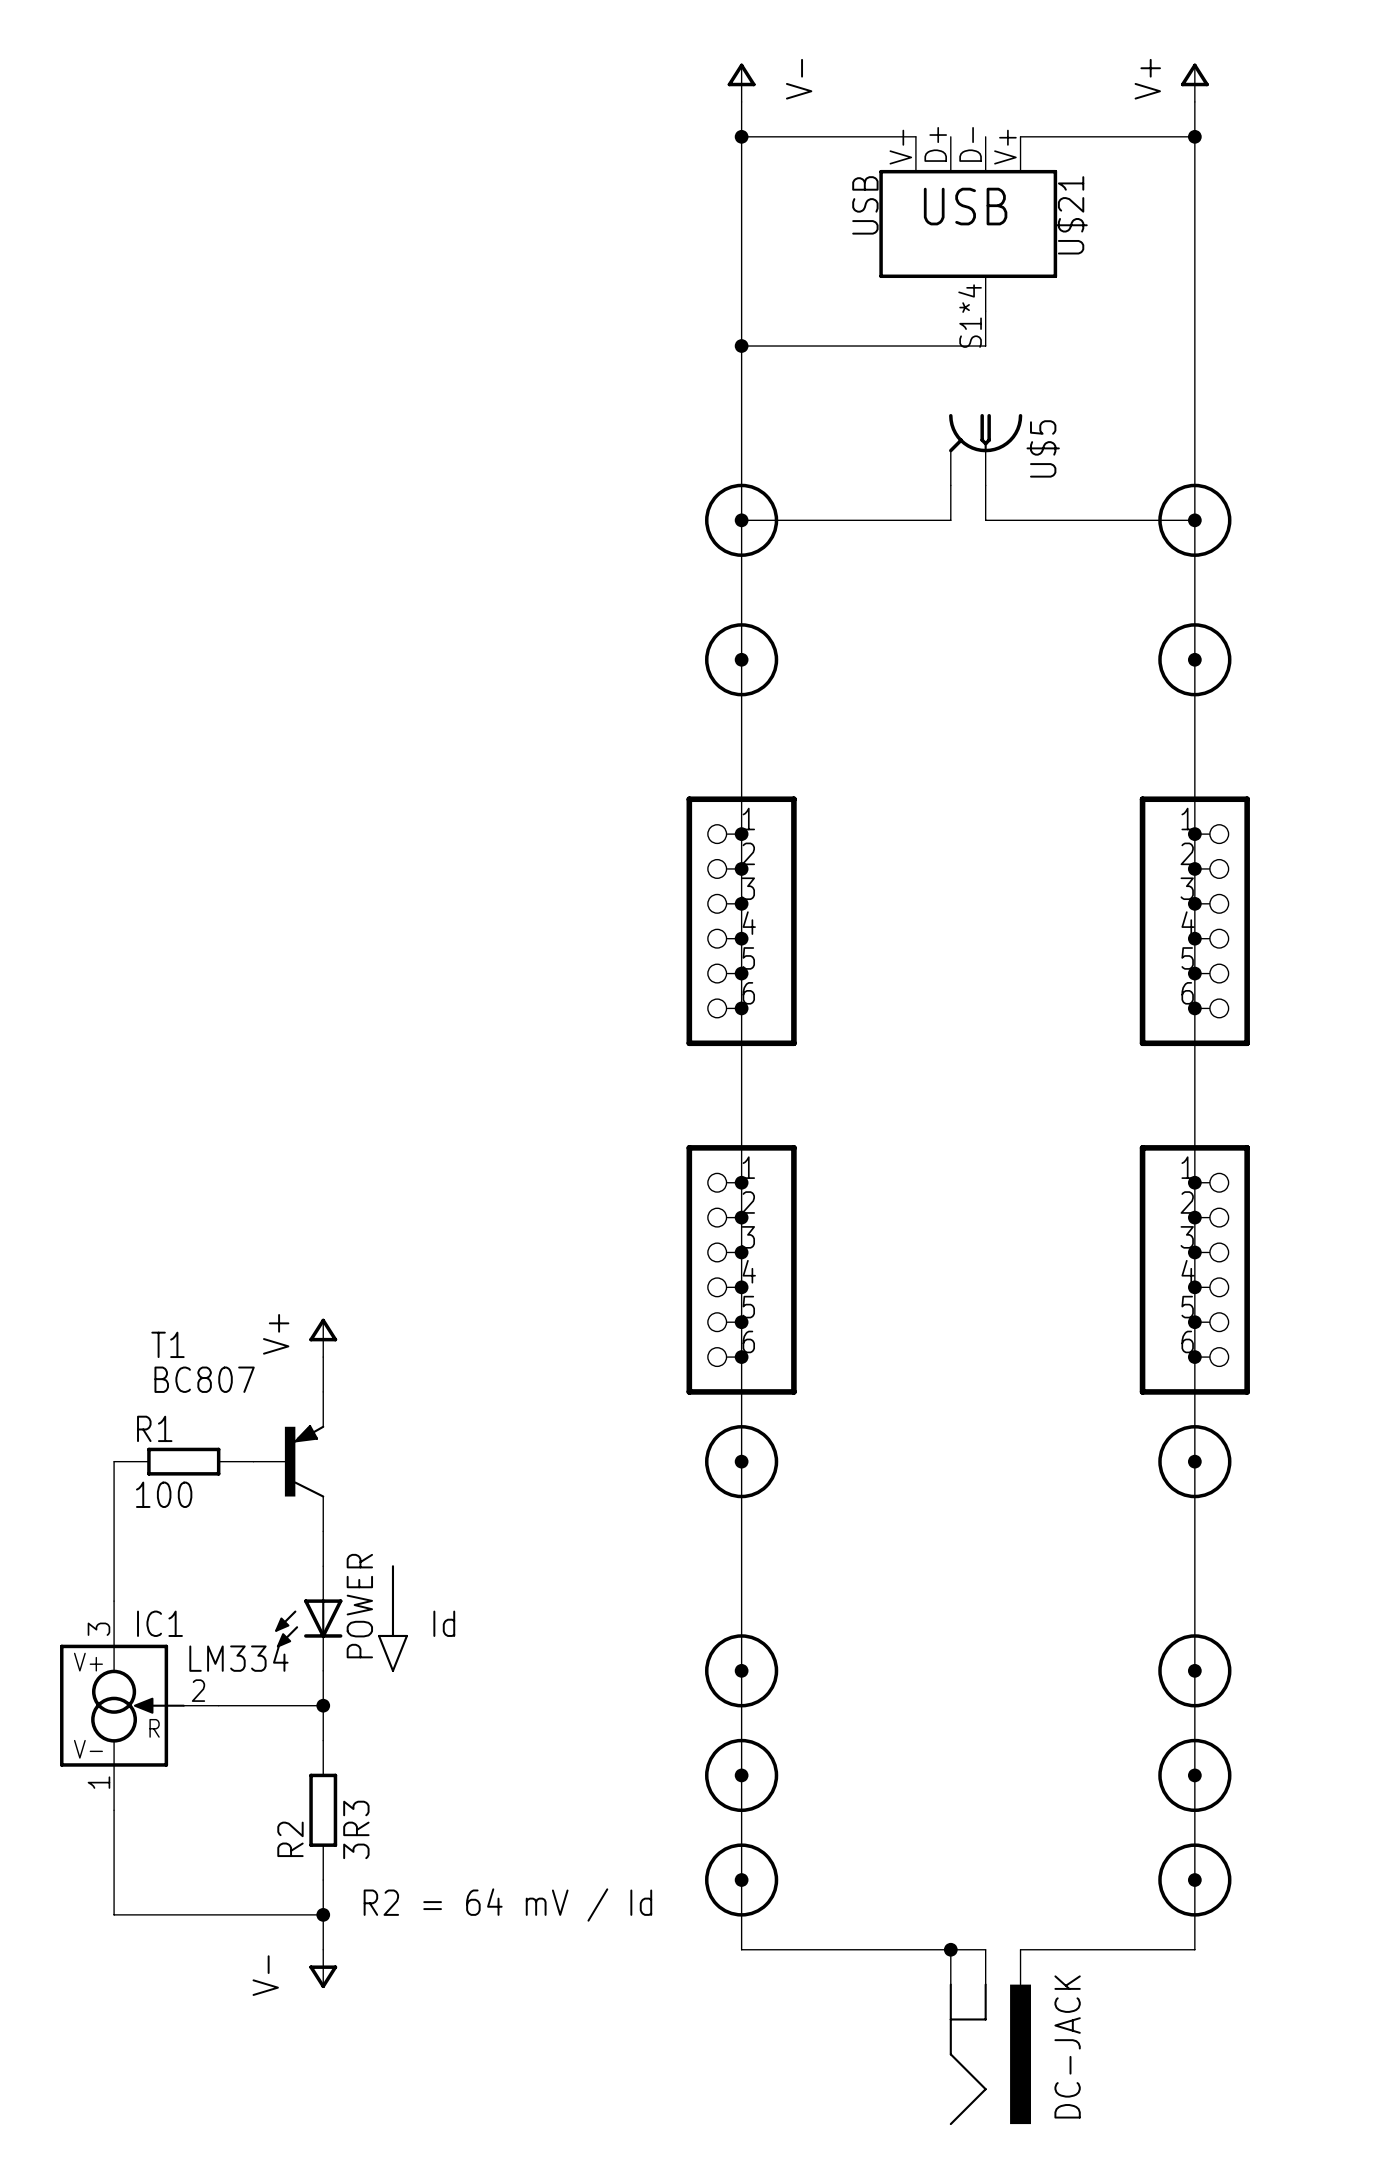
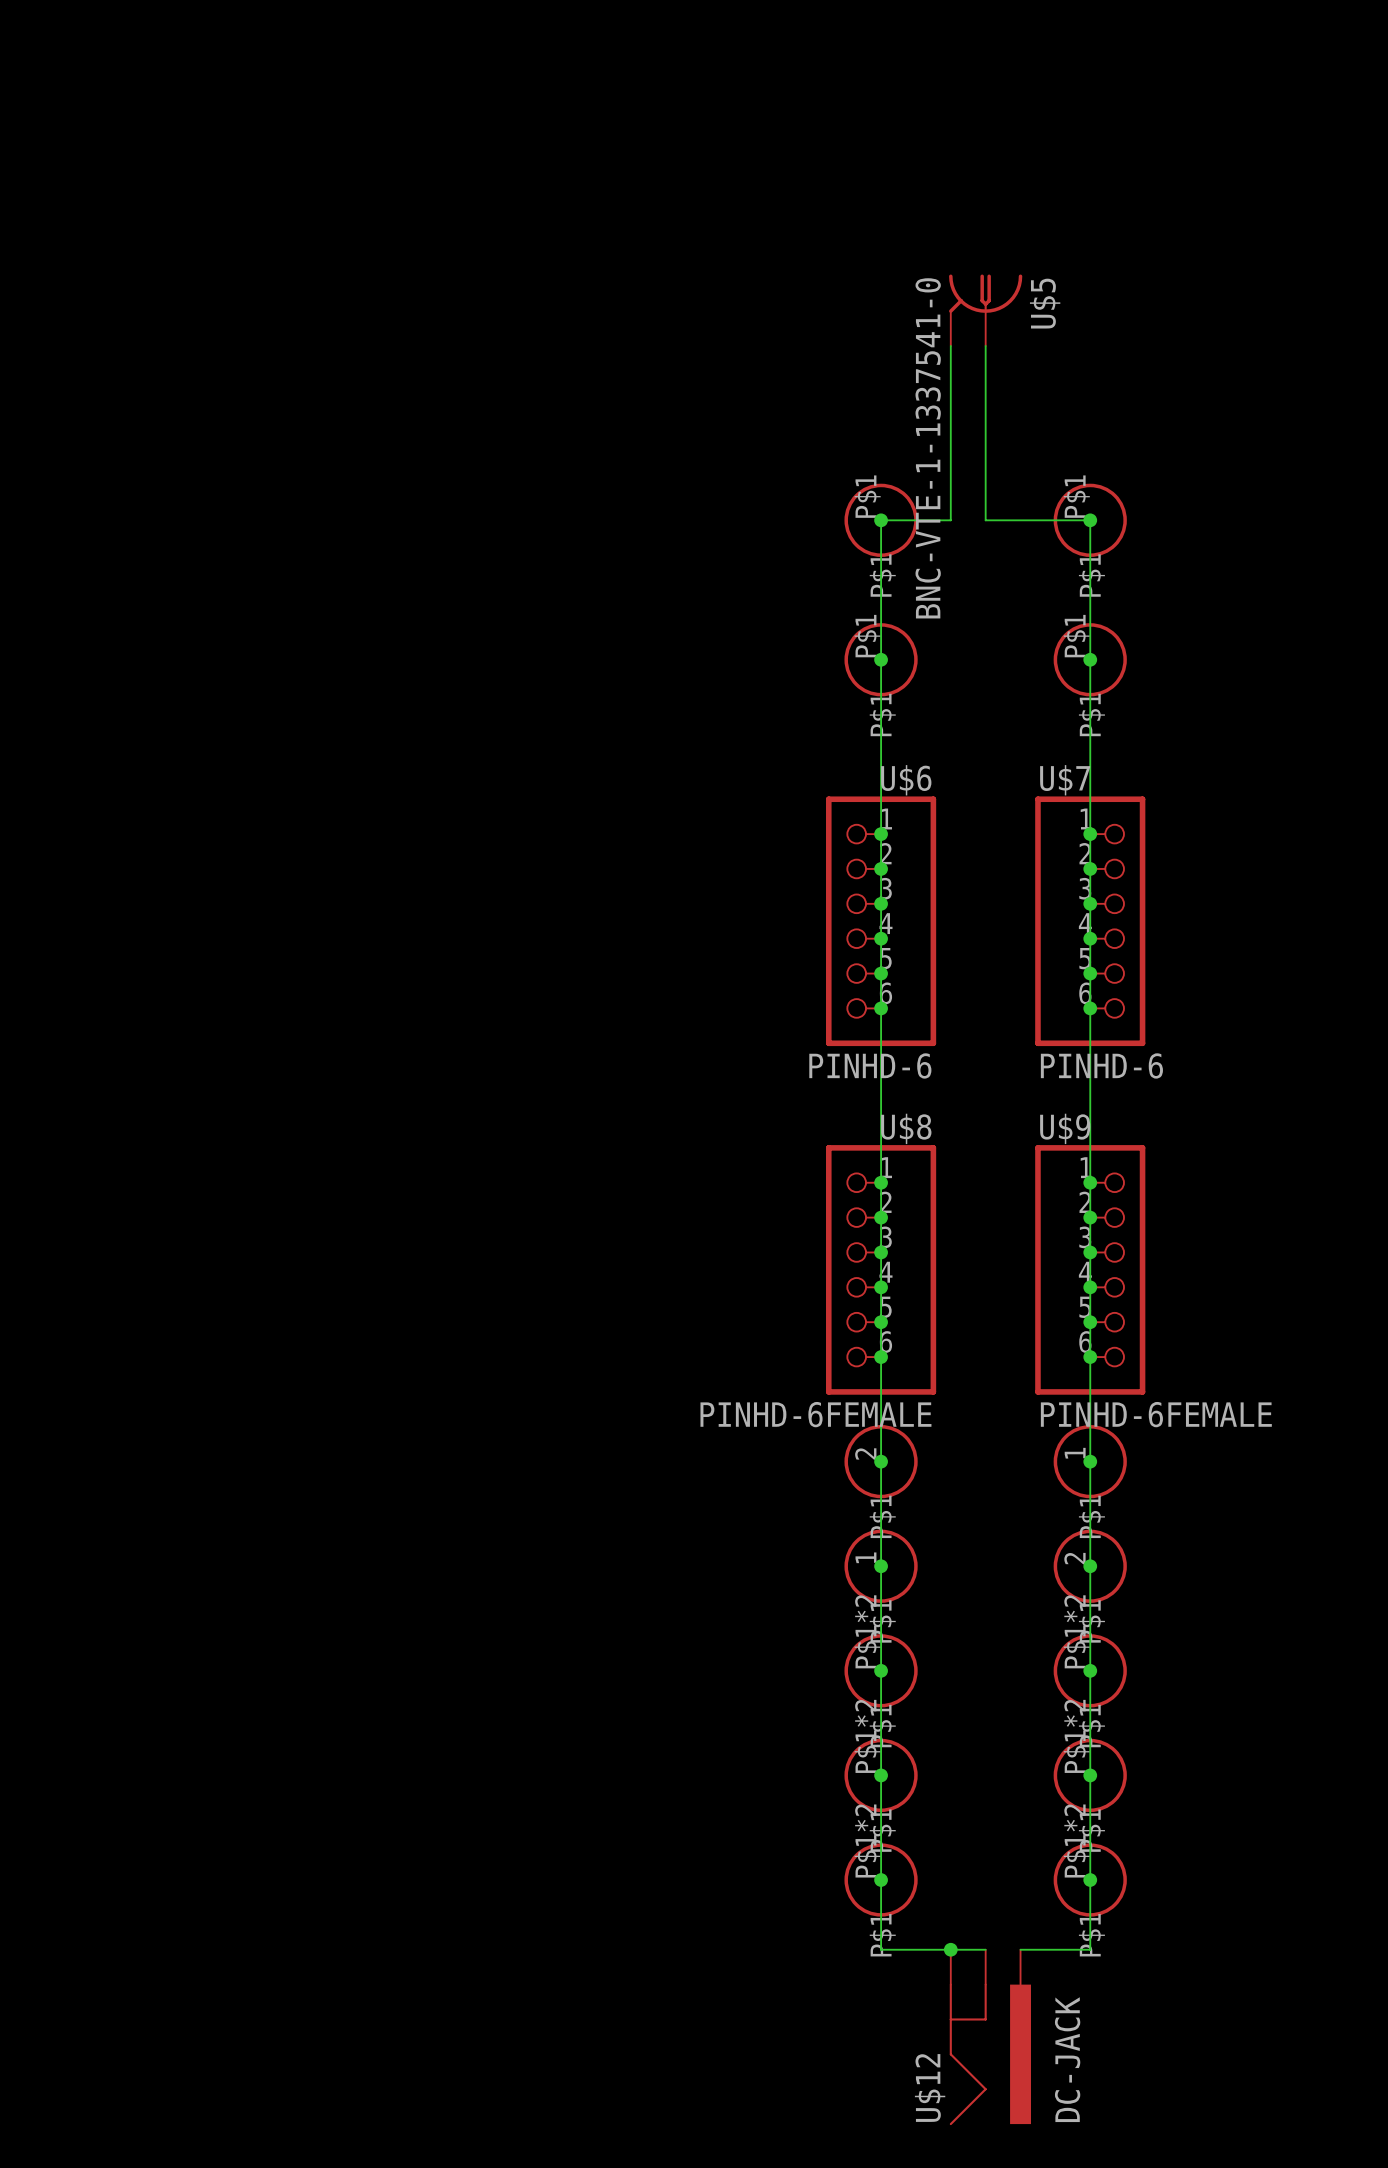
power symbol: V- (741, 82) -> none
power symbol: V+ (1194, 82) -> none
wire: (741, 101) (741, 1949) (881, 1949) -> (881, 520) (881, 1949)
wire: (1194, 101) (1194, 1949) (1090, 1949) -> (1090, 520) (1090, 1949)
wire: (741, 136) (915, 136) -> none
junction: (741, 136) -> none
wire: (1020, 136) (1194, 136) -> none
junction: (1194, 136) -> none
U$21: USB (968, 223) -> none
wire: (985, 311) (985, 346) (741, 346) -> none
junction: (741, 346) -> none
wire: none -> (950, 346) (950, 485)
wire: none -> (985, 346) (985, 485)
U$5 position: (985, 449) -> (985, 310)
U$5 value: none -> BNC-VTE-1-1337541-0 (928, 448)
wire: (741, 520) (881, 520) -> none
part: (741, 520) -> none
junction: (741, 520) -> none
part: none -> (881, 520)
junction: none -> (881, 520)
wire: (1090, 520) (1194, 520) -> none
part: none -> (1090, 520)
junction: none -> (1090, 520)
part: (1194, 520) -> none
junction: (1194, 520) -> none
part: (741, 659) -> none
junction: (741, 659) -> none
part: none -> (881, 659)
junction: none -> (881, 659)
part: none -> (1090, 659)
junction: none -> (1090, 659)
part: (1194, 659) -> none
junction: (1194, 659) -> none
junction: (741, 834) -> none
junction: none -> (881, 834)
junction: none -> (1090, 834)
junction: (1194, 834) -> none
junction: (741, 868) -> none
junction: none -> (881, 868)
junction: none -> (1090, 868)
junction: (1194, 868) -> none
junction: (741, 903) -> none
junction: none -> (881, 903)
junction: none -> (1090, 903)
junction: (1194, 903) -> none
part: (741, 921) -> none
U$6: none -> PINHD-6 (881, 921)
U$7: none -> PINHD-6 (1090, 921)
part: (1194, 921) -> none
junction: (741, 938) -> none
junction: none -> (881, 938)
junction: none -> (1090, 938)
junction: (1194, 938) -> none
junction: (741, 973) -> none
junction: none -> (881, 973)
junction: none -> (1090, 973)
junction: (1194, 973) -> none
junction: (741, 1008) -> none
junction: none -> (881, 1008)
junction: none -> (1090, 1008)
junction: (1194, 1008) -> none
junction: (741, 1182) -> none
junction: none -> (881, 1182)
junction: none -> (1090, 1182)
junction: (1194, 1182) -> none
junction: (741, 1217) -> none
junction: none -> (881, 1217)
junction: none -> (1090, 1217)
junction: (1194, 1217) -> none
junction: (741, 1252) -> none
junction: none -> (881, 1252)
junction: none -> (1090, 1252)
junction: (1194, 1252) -> none
part: (741, 1269) -> none
U$8: none -> PINHD-6FEMALE (881, 1269)
U$9: none -> PINHD-6FEMALE (1090, 1269)
part: (1194, 1269) -> none
junction: (741, 1287) -> none
junction: none -> (881, 1287)
junction: none -> (1090, 1287)
junction: (1194, 1287) -> none
junction: (741, 1322) -> none
junction: none -> (881, 1322)
junction: none -> (1090, 1322)
junction: (1194, 1322) -> none
power symbol: V+ (323, 1337) -> none
wire: (323, 1357) (323, 1391) -> none
junction: (741, 1357) -> none
junction: none -> (881, 1357)
junction: none -> (1090, 1357)
junction: (1194, 1357) -> none
wire: (114, 1461) (114, 1601) -> none
R1: 100 (183, 1461) -> none
T1: BC807 (288, 1461) -> none
part: (741, 1461) -> none
junction: (741, 1461) -> none
part: none -> (881, 1461)
junction: none -> (881, 1461)
part: none -> (1090, 1461)
junction: none -> (1090, 1461)
part: (1194, 1461) -> none
junction: (1194, 1461) -> none
wire: (323, 1531) (323, 1566) -> none
line: (392, 1566) (392, 1635) -> none
part: none -> (881, 1566)
junction: none -> (881, 1566)
part: none -> (1090, 1566)
junction: none -> (1090, 1566)
POWER: (308, 1618) -> none
text: Id (444, 1623) -> none
line: (379, 1635) (406, 1635) (392, 1670) (379, 1635) -> none
wire: (323, 1670) (323, 1740) -> none
part: (741, 1670) -> none
junction: (741, 1670) -> none
part: none -> (881, 1670)
junction: none -> (881, 1670)
part: none -> (1090, 1670)
junction: none -> (1090, 1670)
part: (1194, 1670) -> none
junction: (1194, 1670) -> none
IC1: LM334 (139, 1705) -> none
wire: (218, 1705) (323, 1705) -> none
junction: (323, 1705) -> none
part: (741, 1775) -> none
junction: (741, 1775) -> none
part: none -> (881, 1775)
junction: none -> (881, 1775)
part: none -> (1090, 1775)
junction: none -> (1090, 1775)
part: (1194, 1775) -> none
junction: (1194, 1775) -> none
wire: (114, 1810) (114, 1914) (323, 1914) -> none
R2: 3R3 (323, 1810) -> none
wire: (323, 1880) (323, 1949) -> none
part: (741, 1880) -> none
junction: (741, 1880) -> none
part: none -> (881, 1880)
junction: none -> (881, 1880)
part: none -> (1090, 1880)
junction: none -> (1090, 1880)
part: (1194, 1880) -> none
junction: (1194, 1880) -> none
text: R2 = 64 mV / Id (507, 1905) -> none
junction: (323, 1914) -> none
power symbol: V- (323, 1968) -> none
U$12 name: none -> U$12 (930, 2087)

